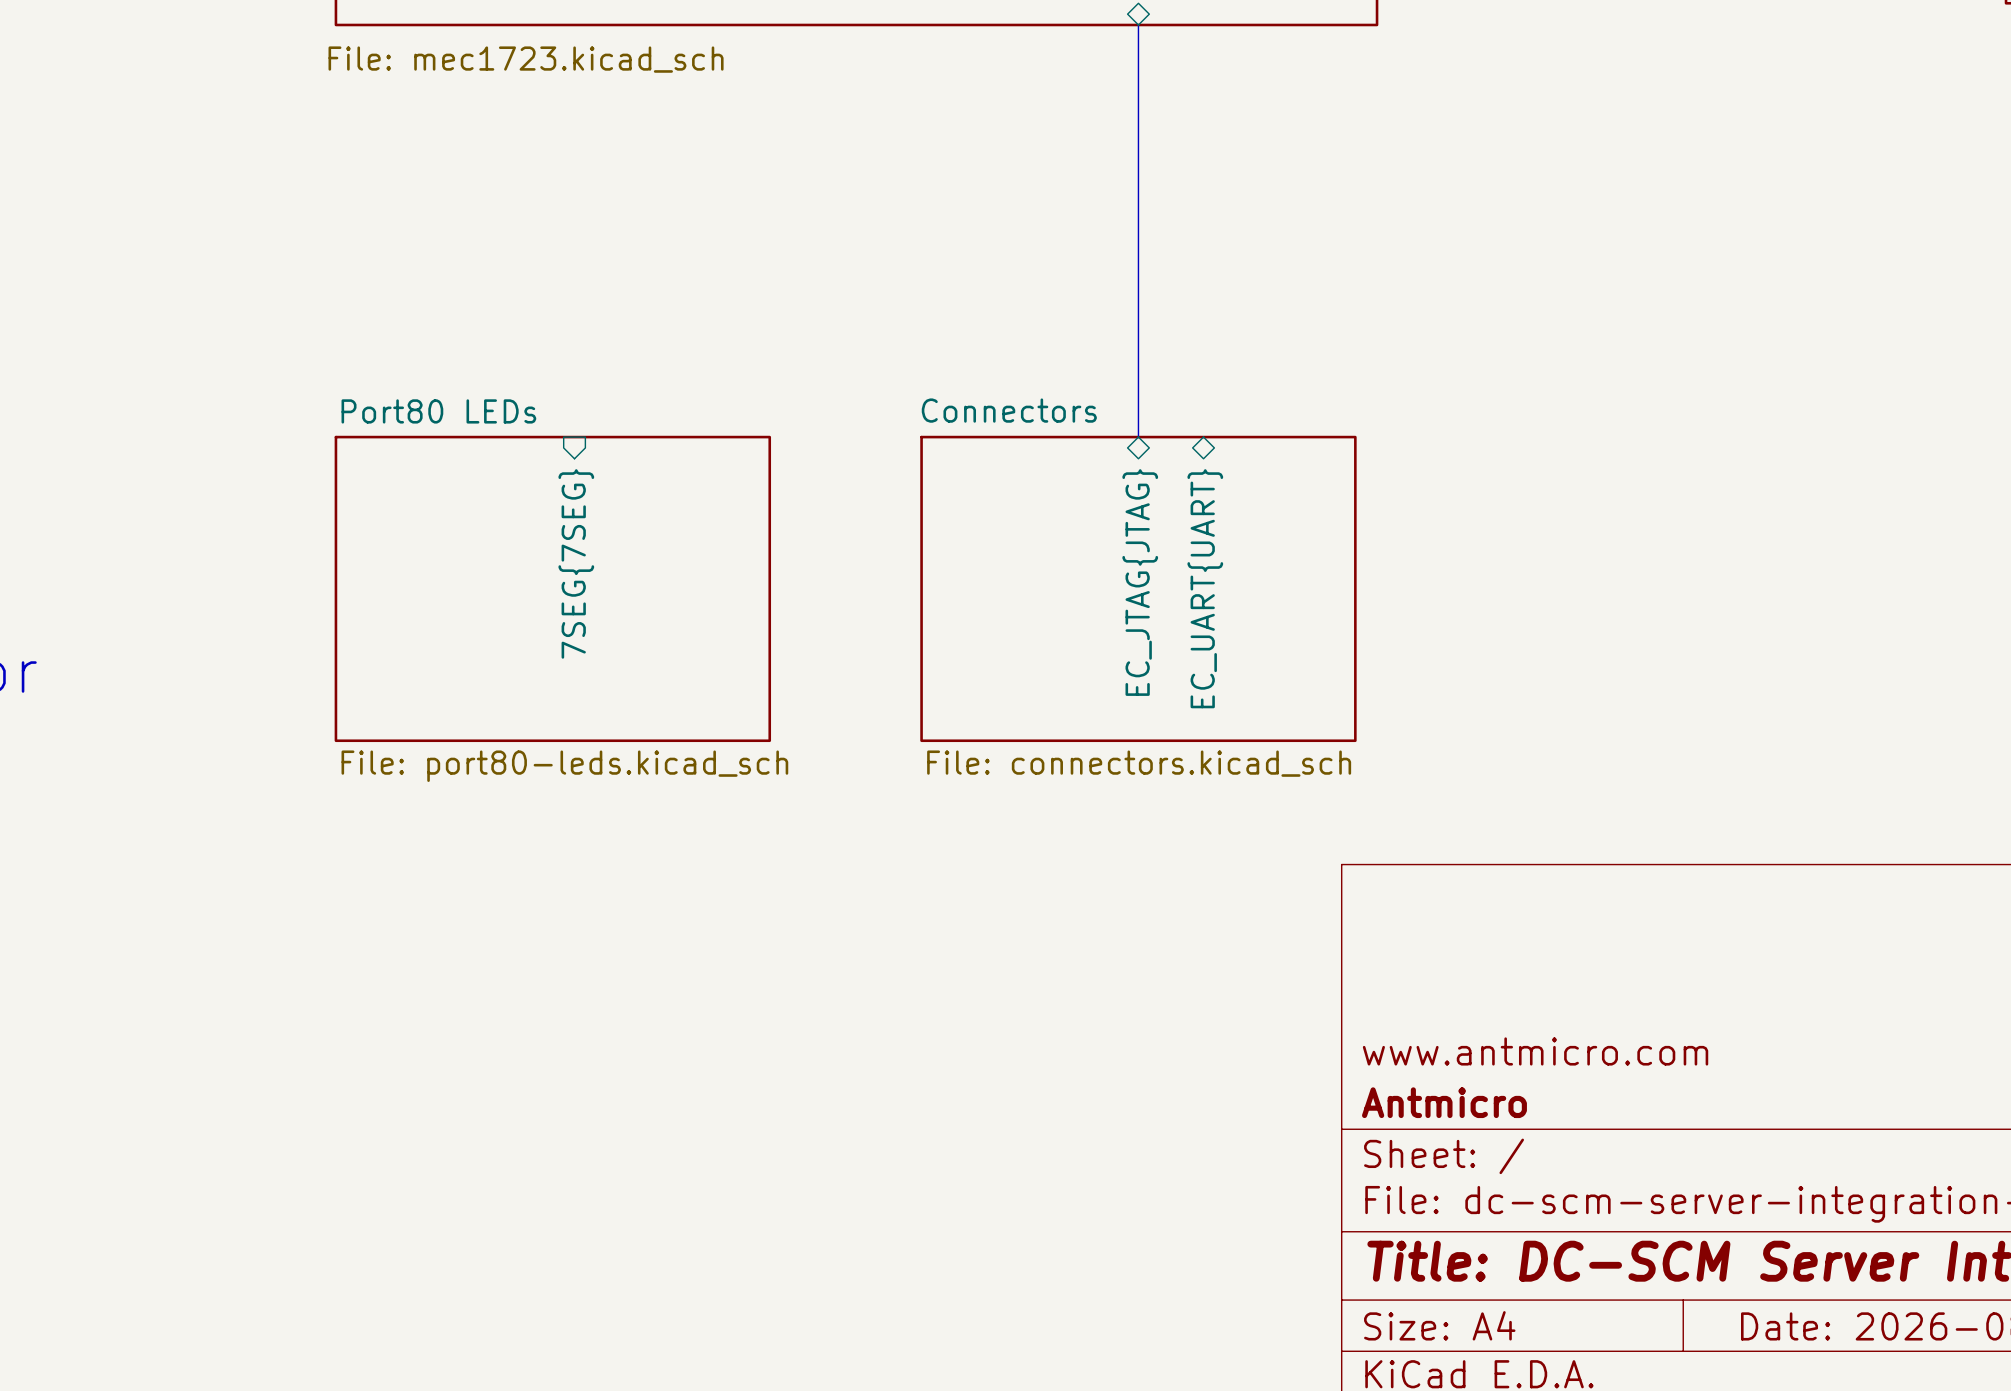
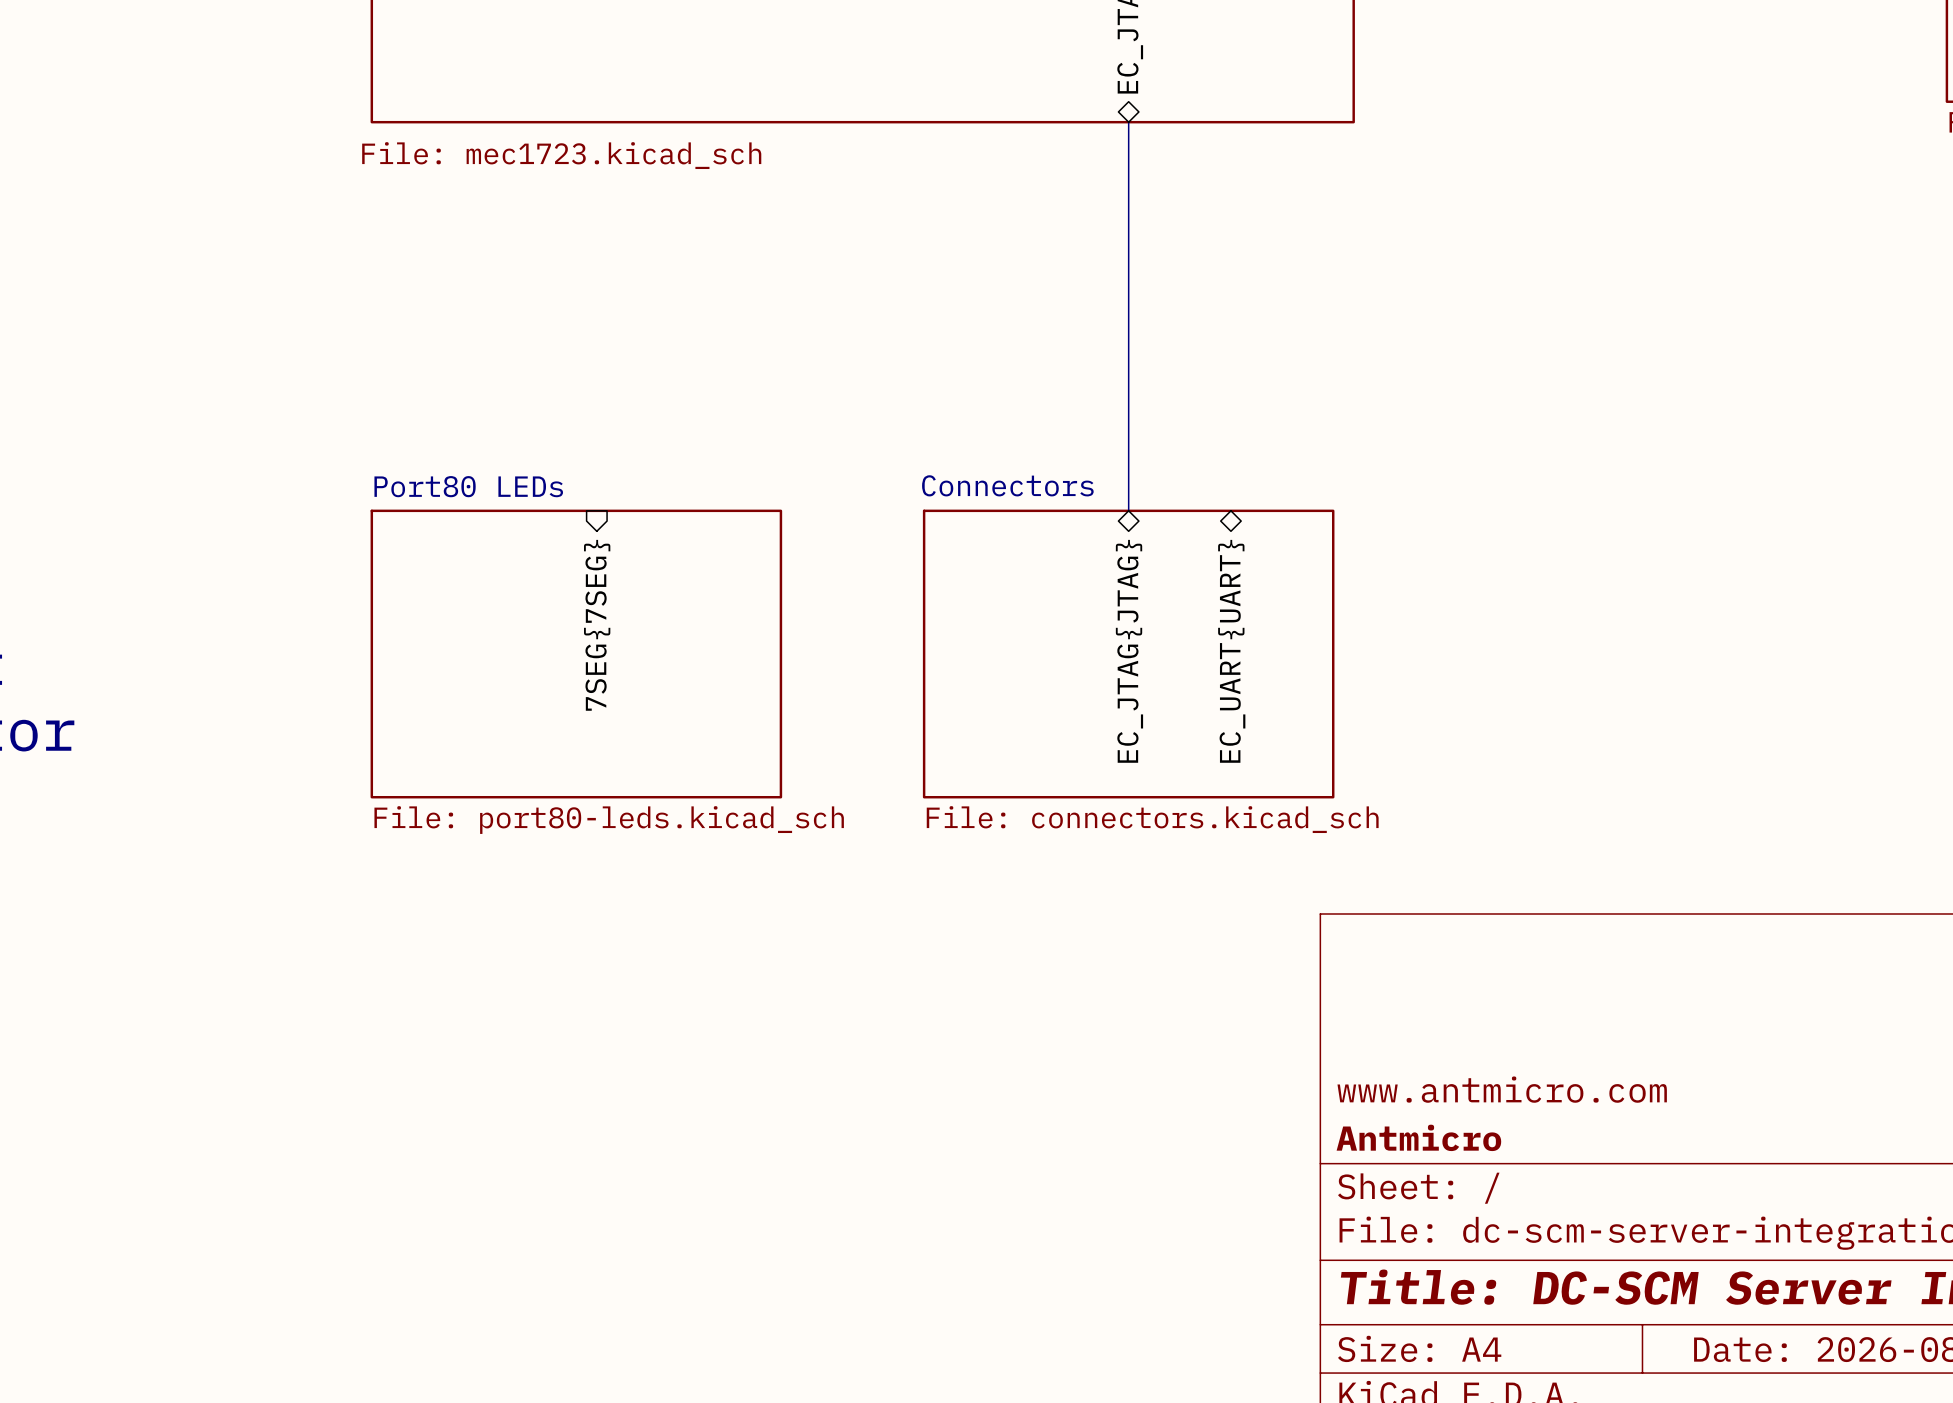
sheet pin position: EC_UART{UART} (1205, 588) -> EC_UART{UART} (1231, 651)

